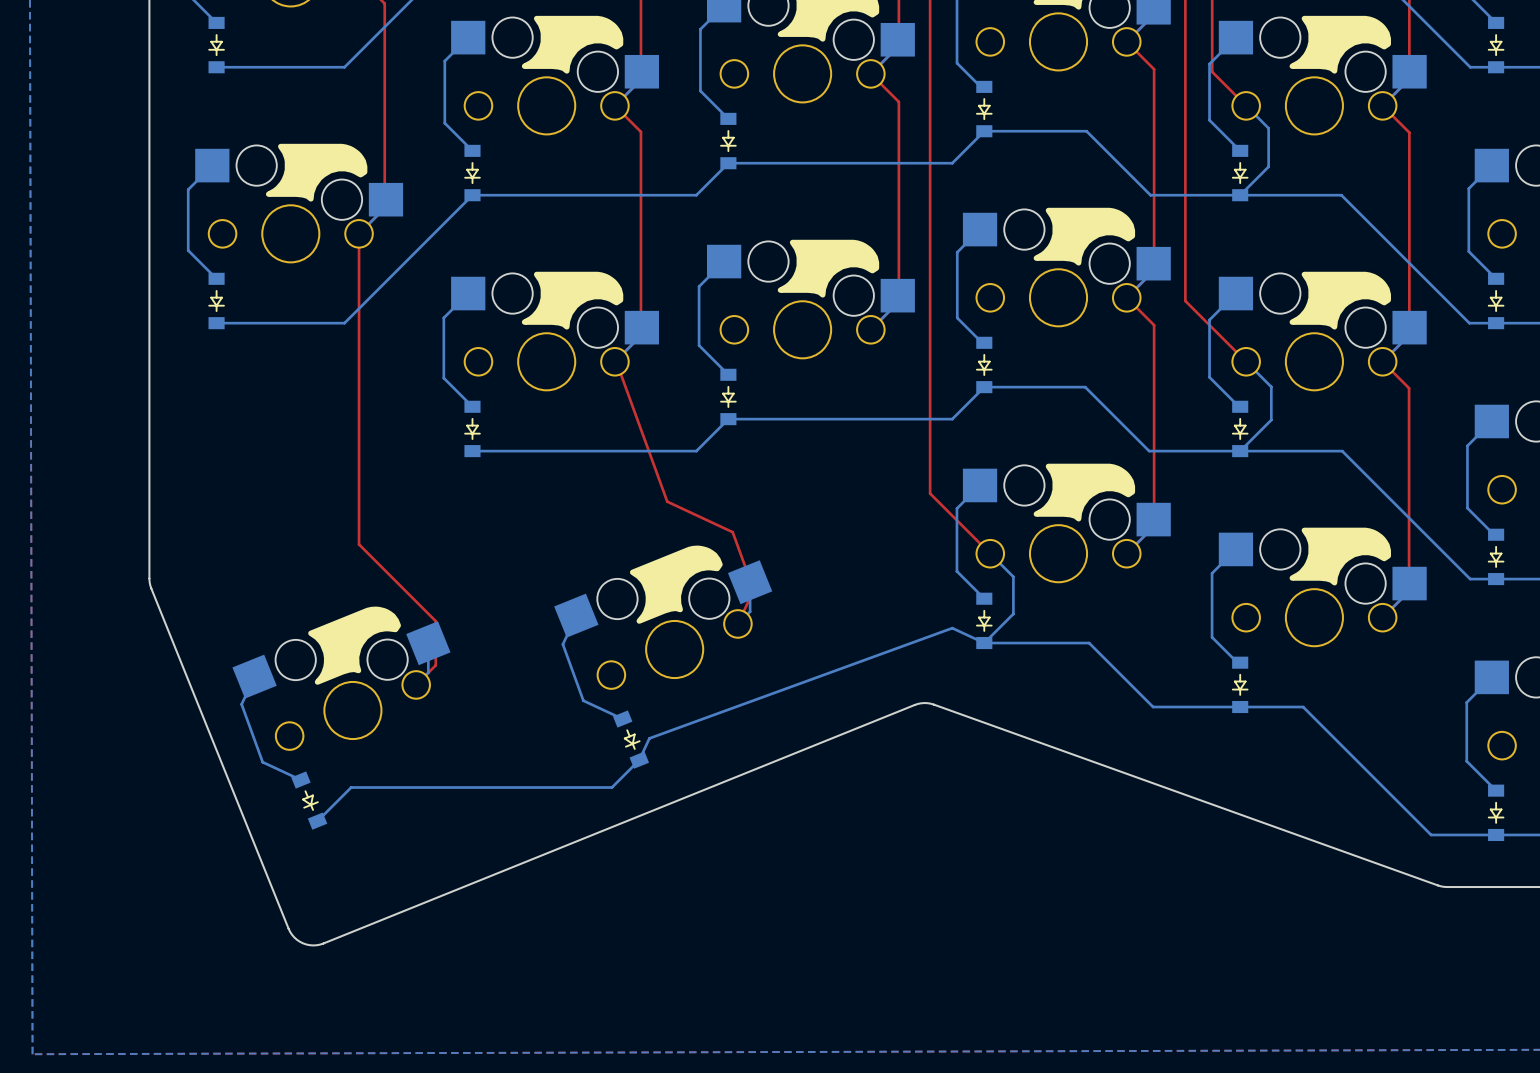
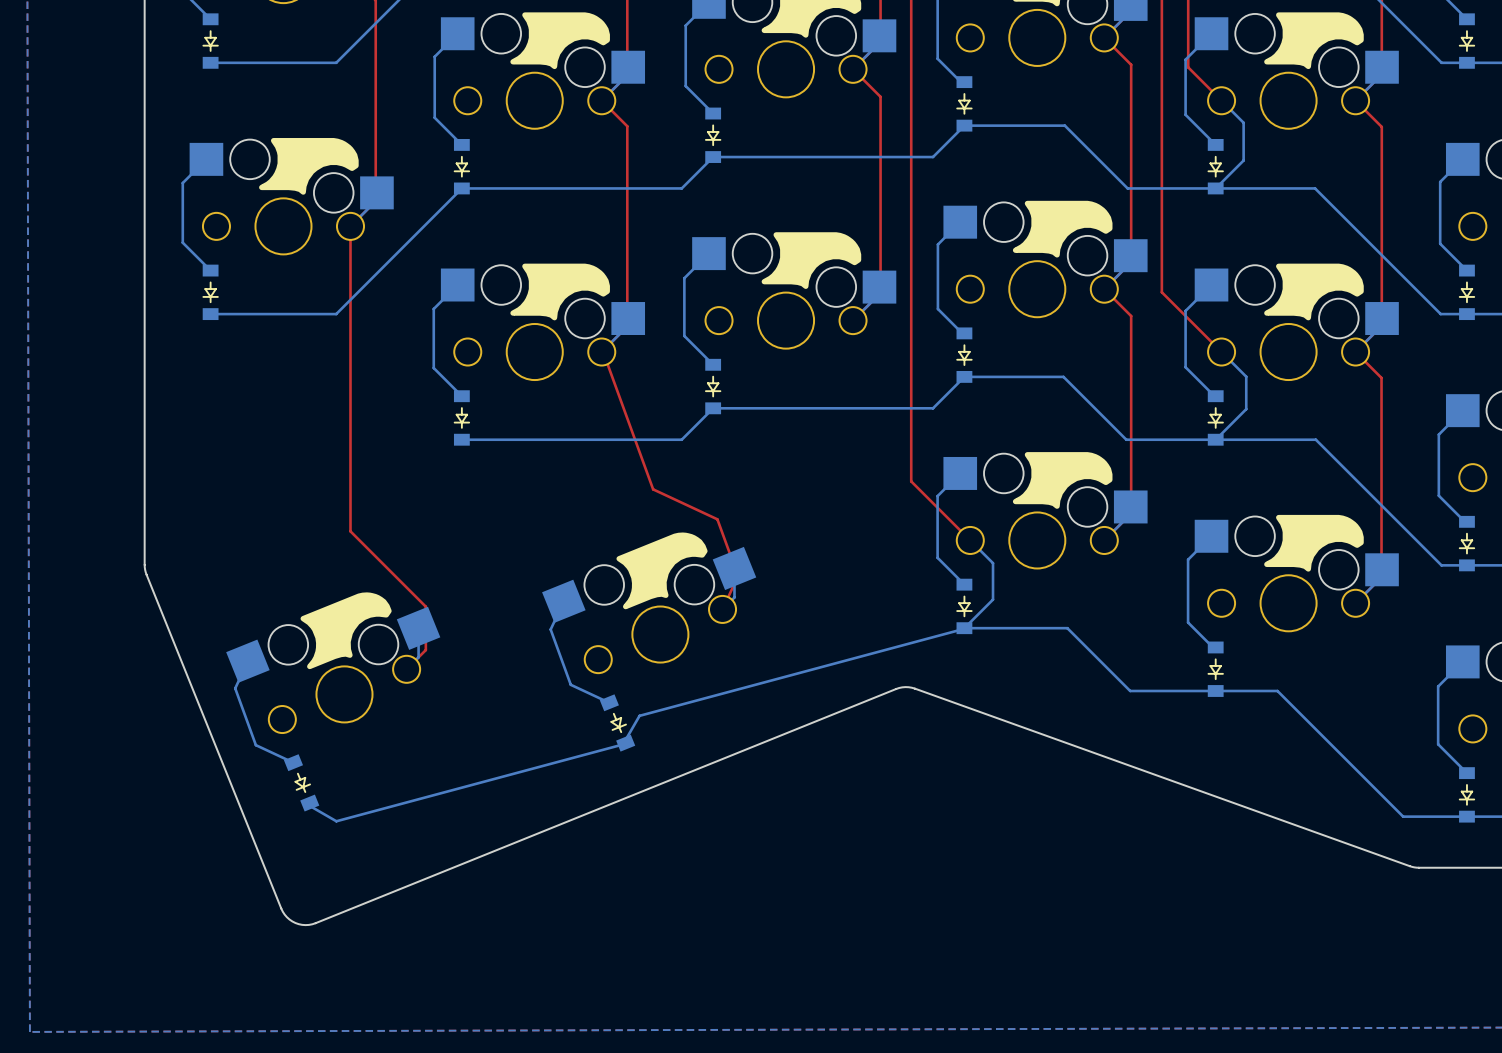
bottom track: (984, 643) (952, 628) (649, 738) (639, 760) (611, 787) (351, 787) (317, 821) -> none
bottom track: none -> (961, 629) (639, 715) (623, 744) (336, 821) (307, 804)

